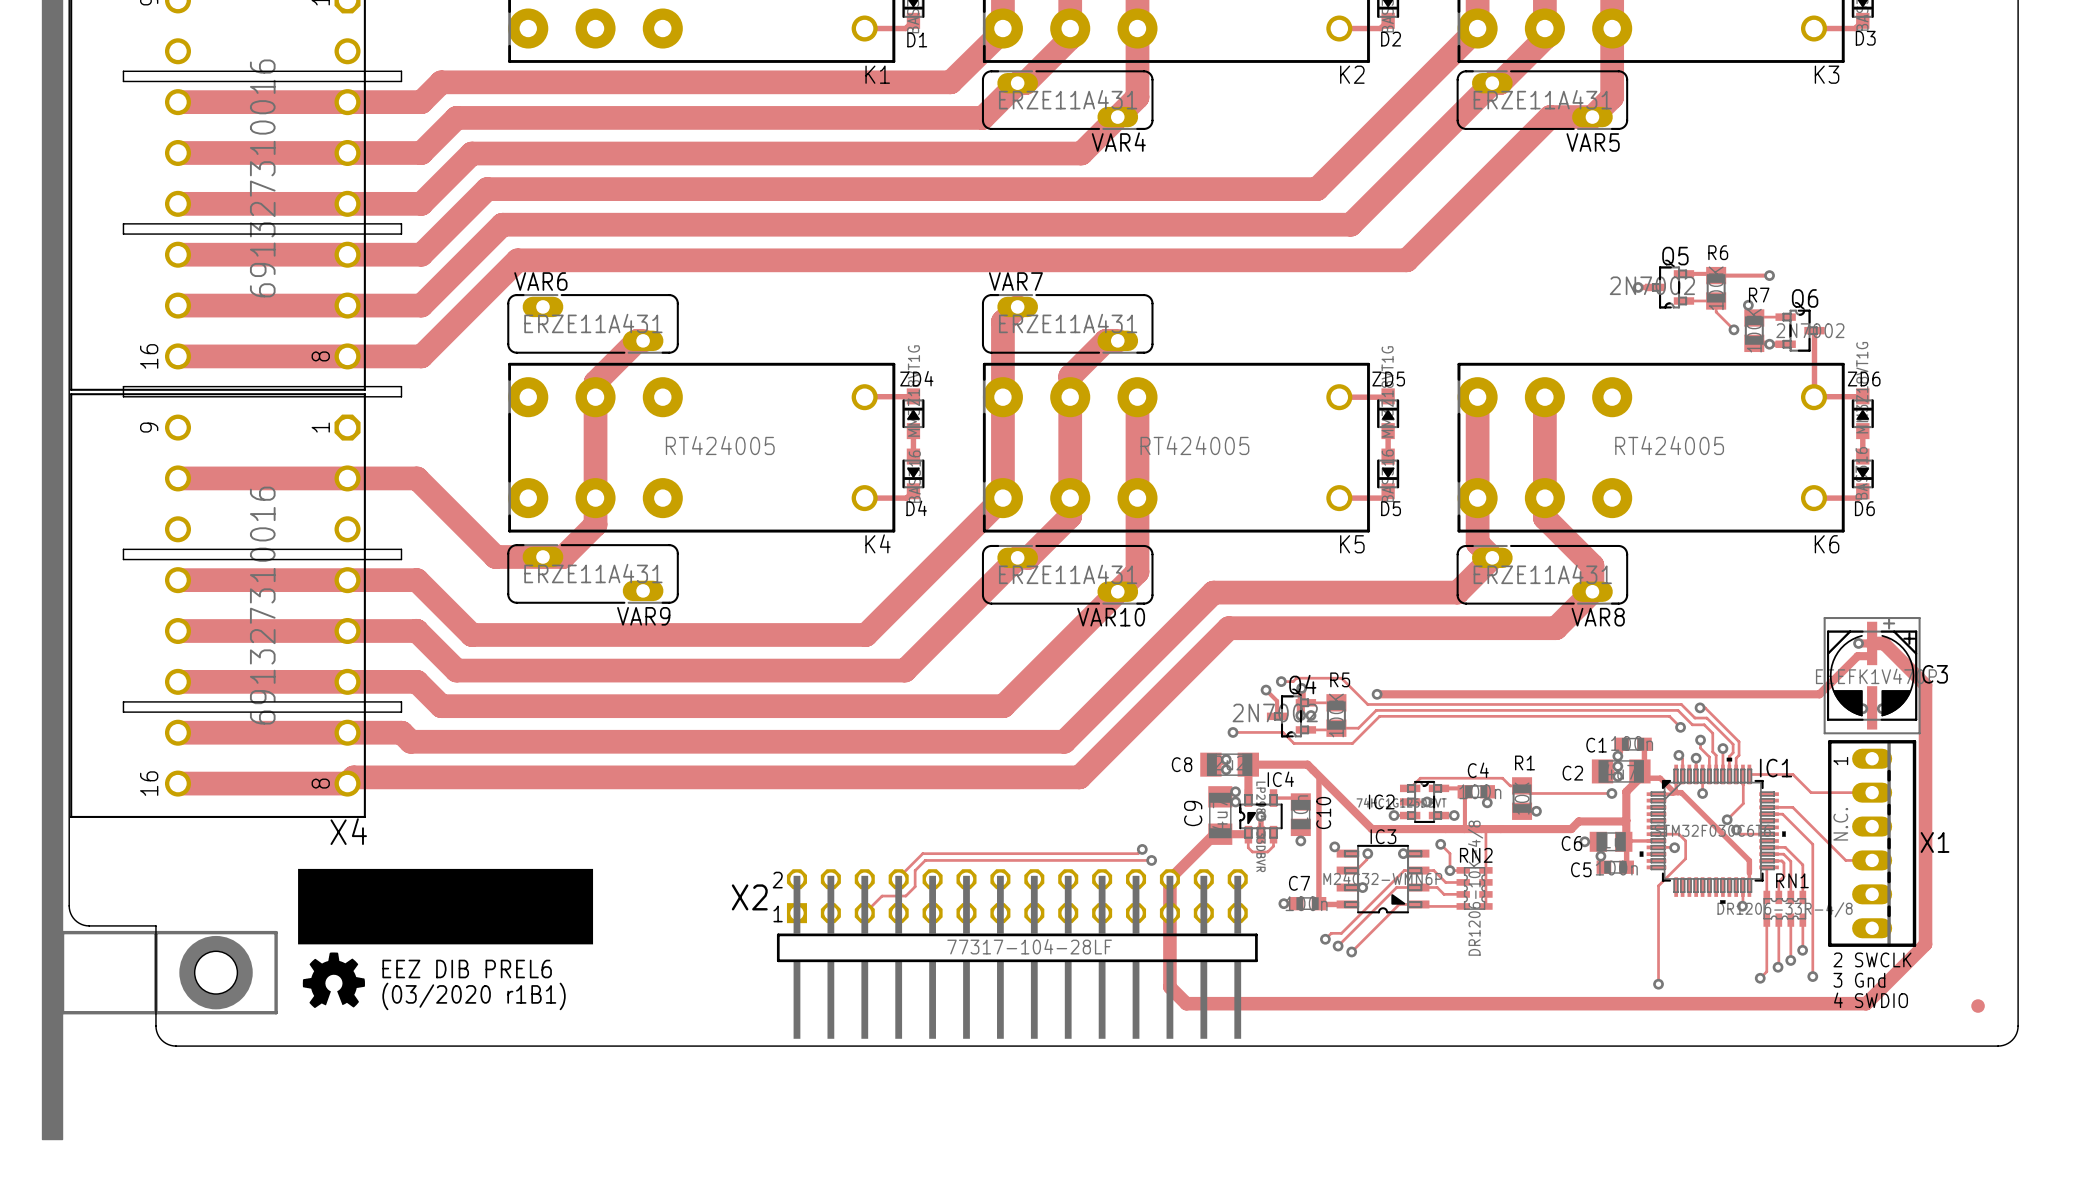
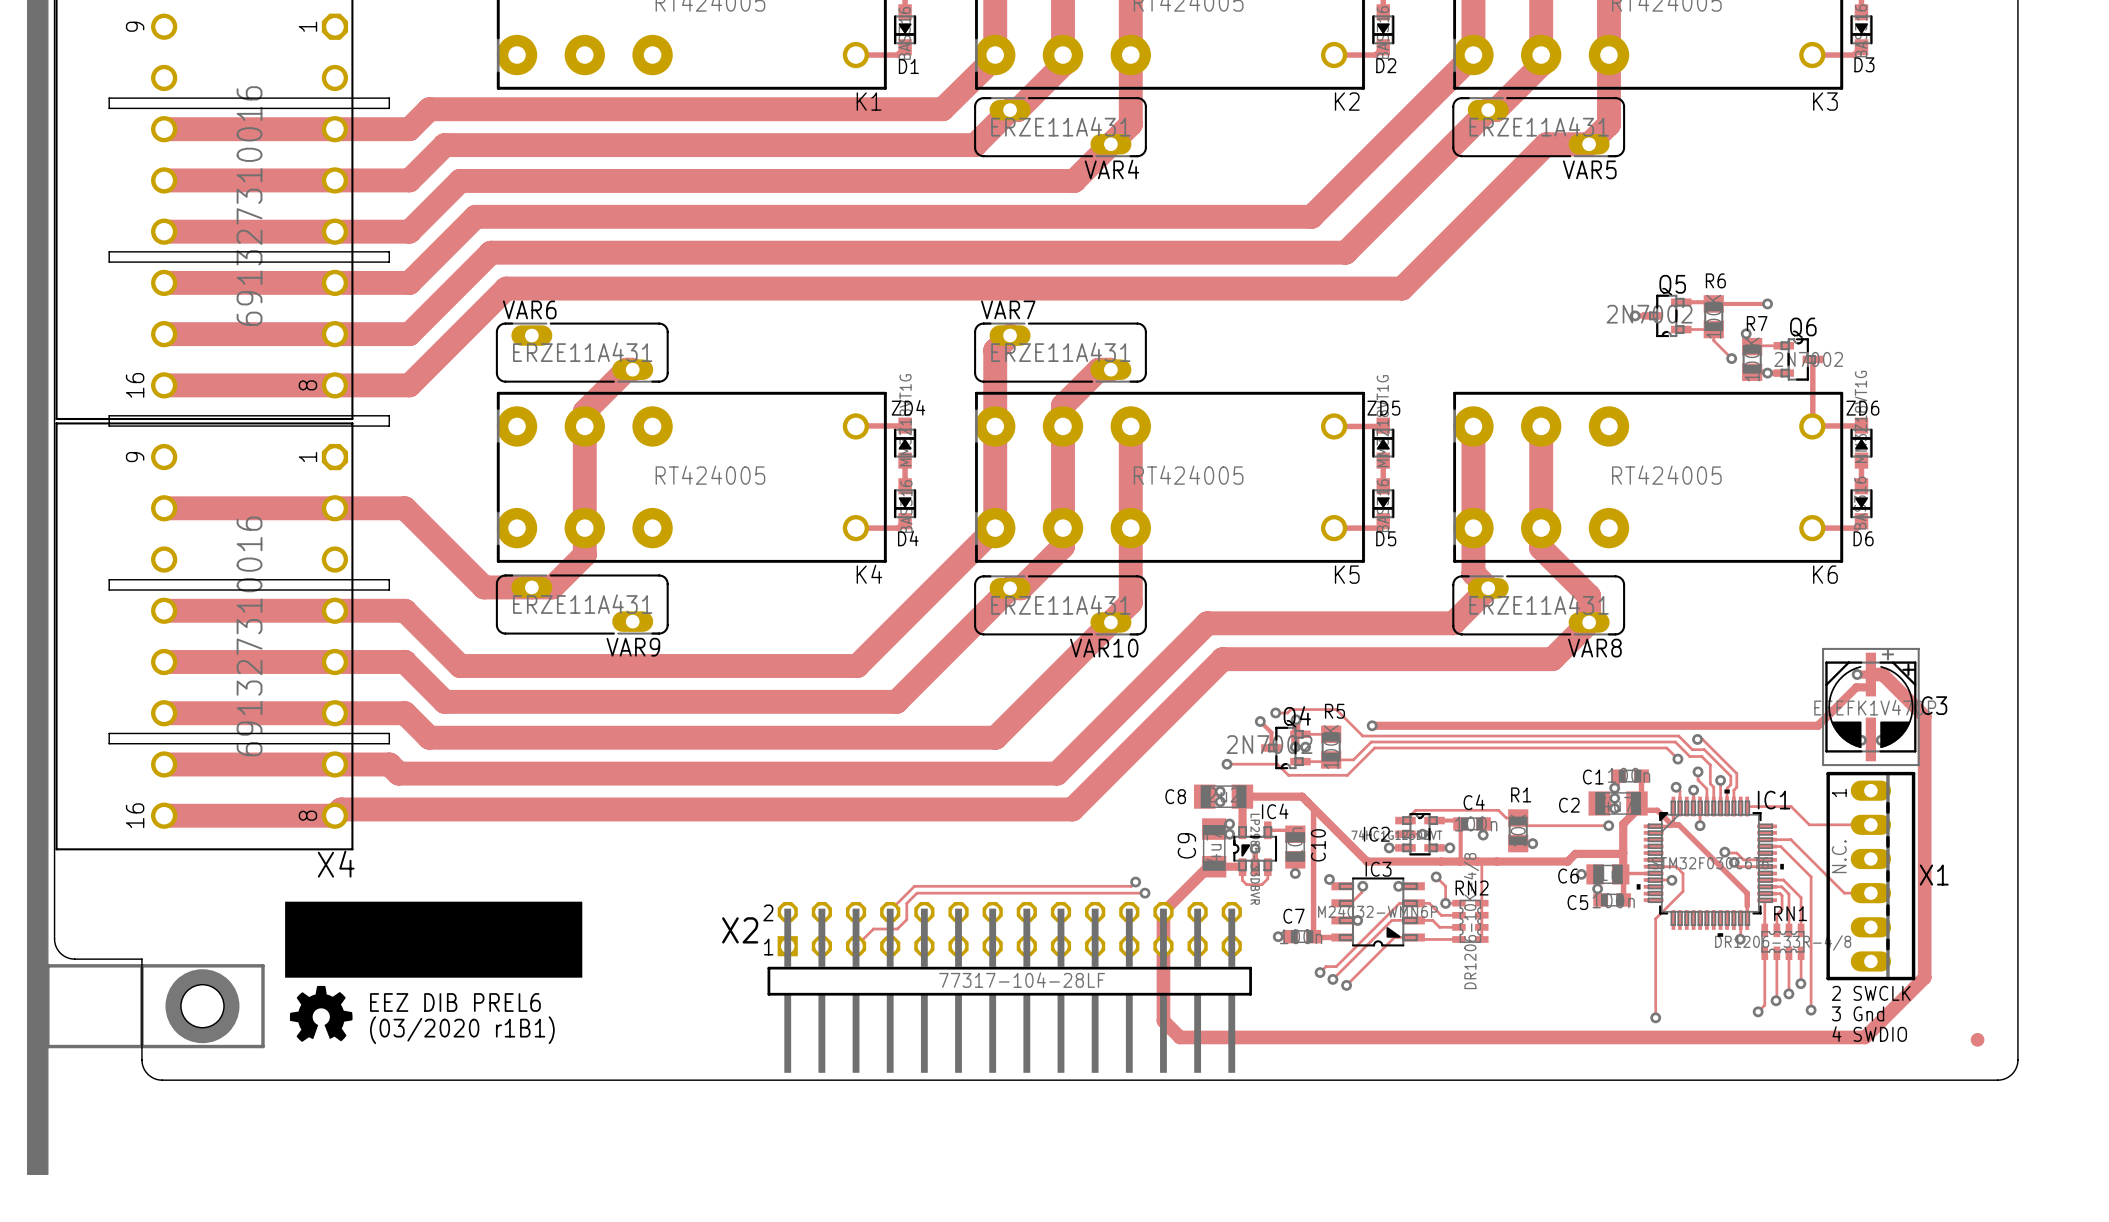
track: (1742, 774) (1743, 803) (1727, 819) -> none
track: none -> (1729, 853) (1736, 853) (1743, 859) (1767, 859)

